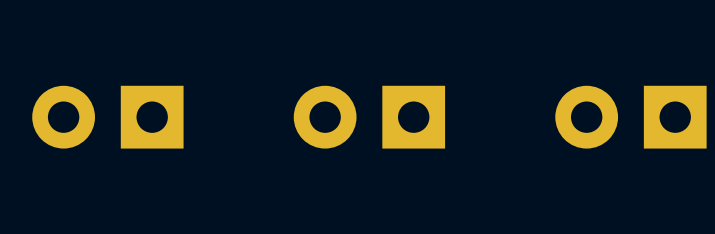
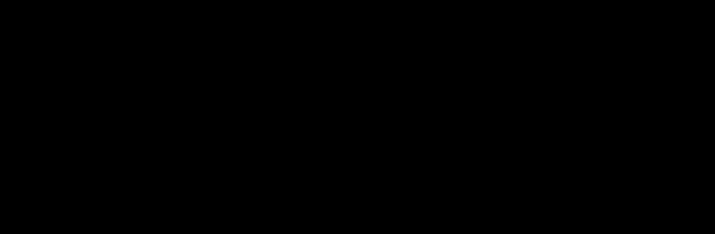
part: (107, 117) -> none
part: (369, 117) -> none
part: (630, 117) -> none

